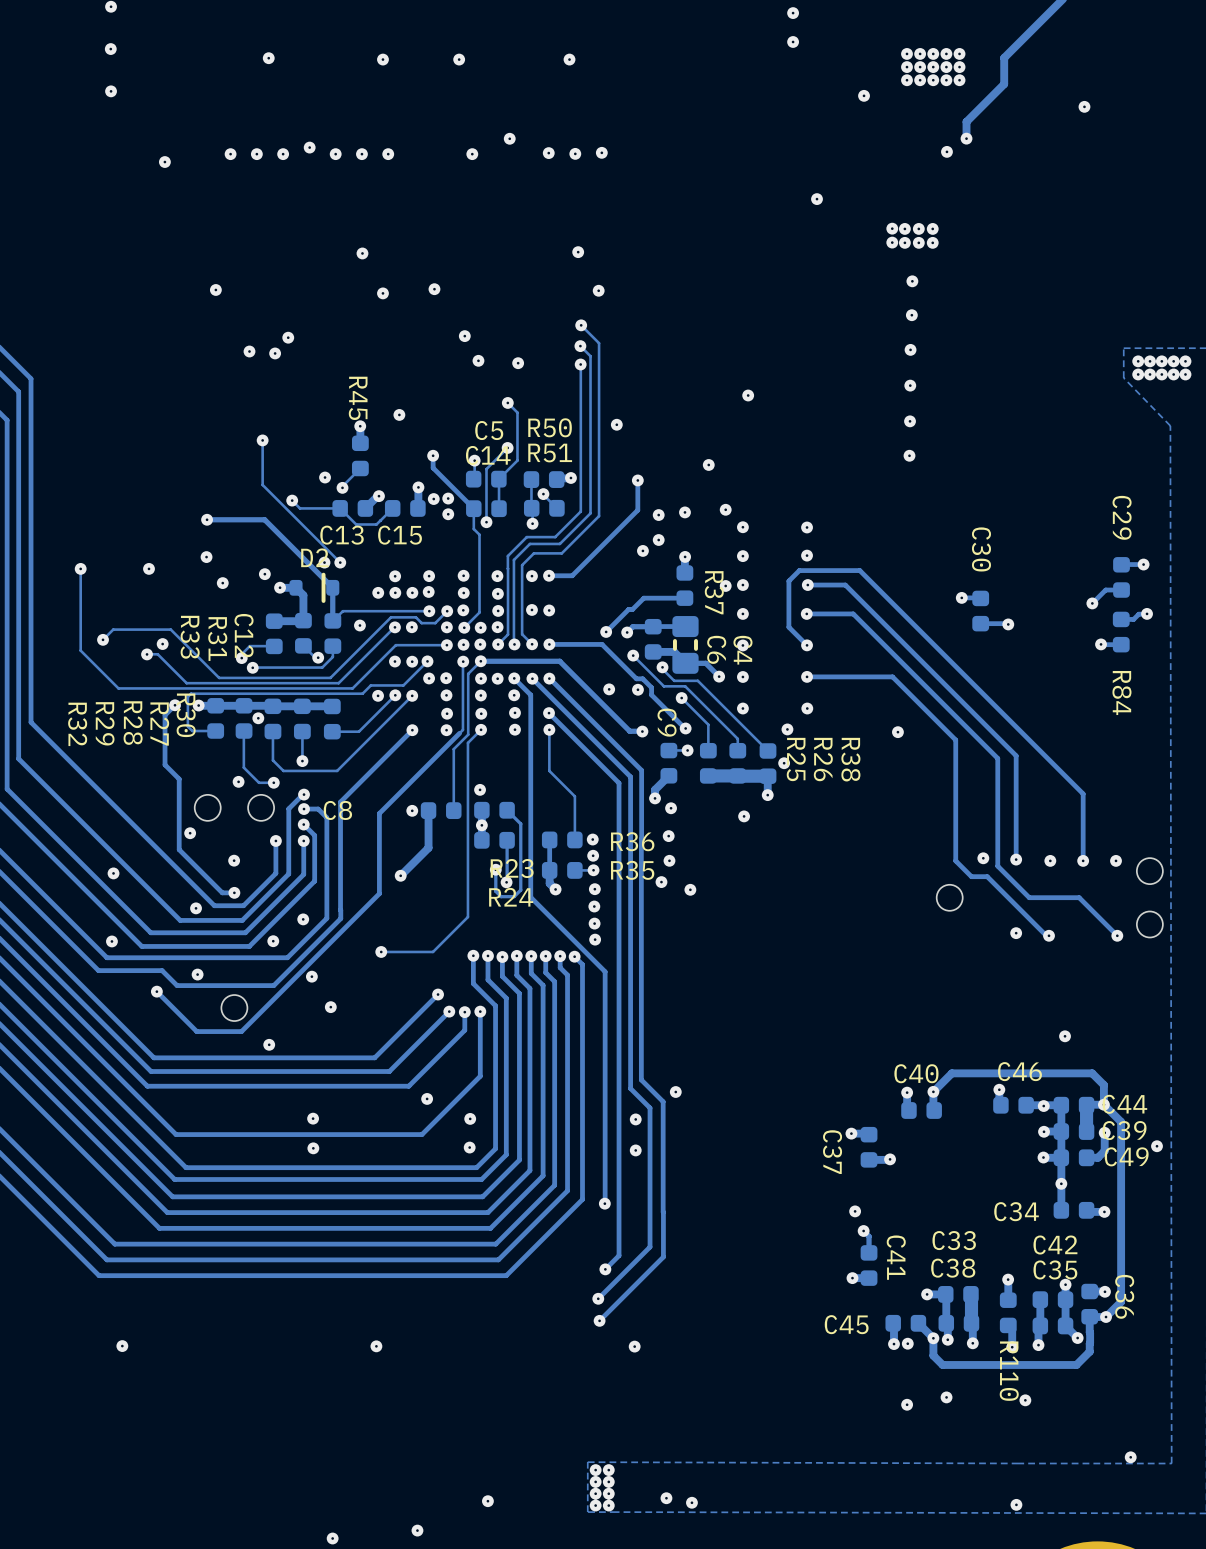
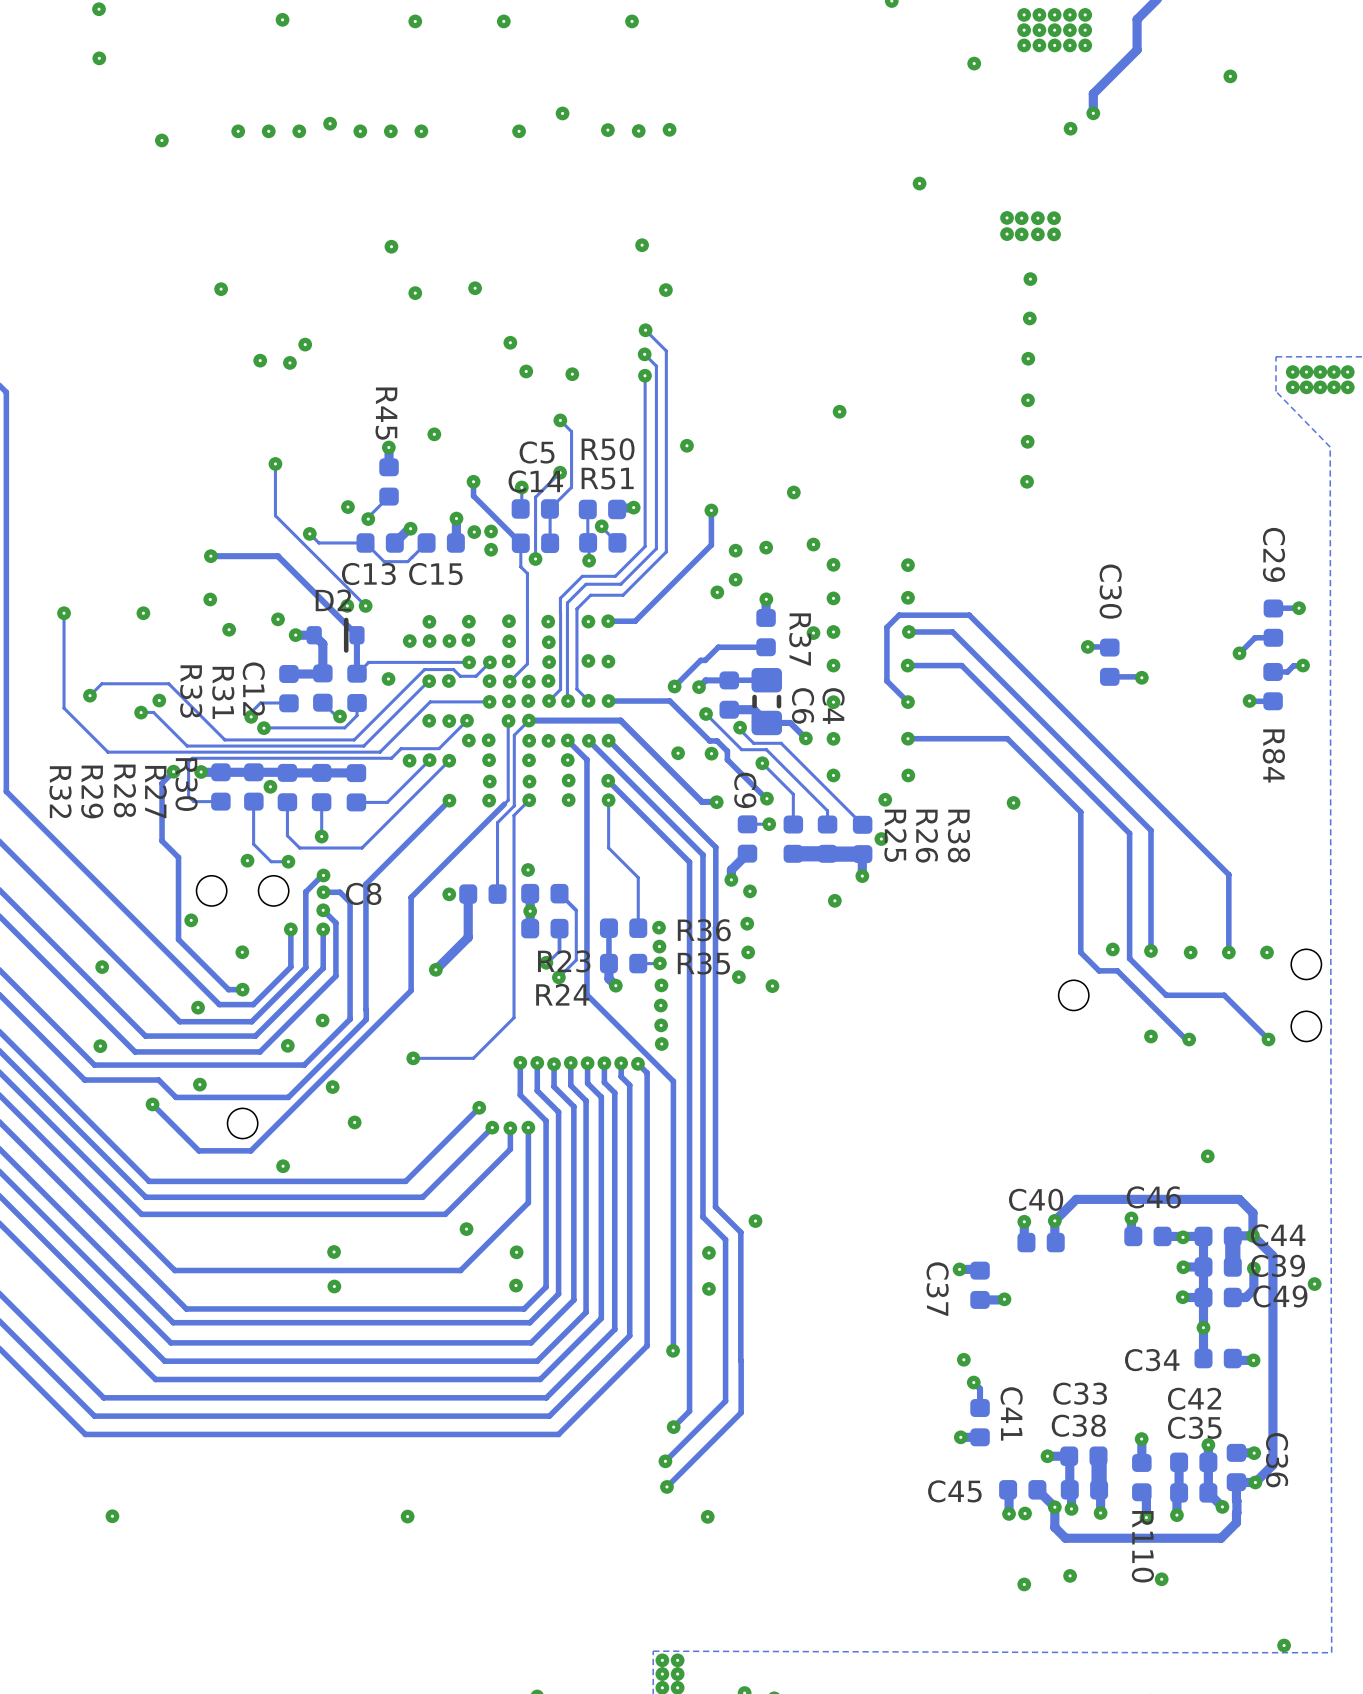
track: (520, 823) (520, 890) (514, 896) (501, 896) (495, 891) (495, 869) -> (575, 909) (576, 960) (558, 977)
track: (507, 859) (507, 881) -> (559, 951) (547, 962)

